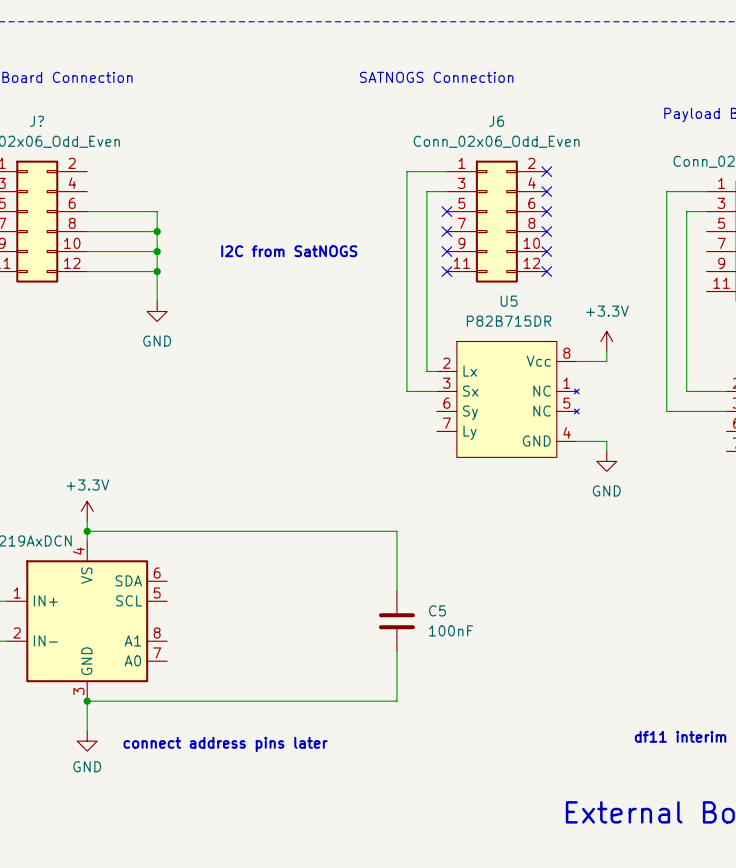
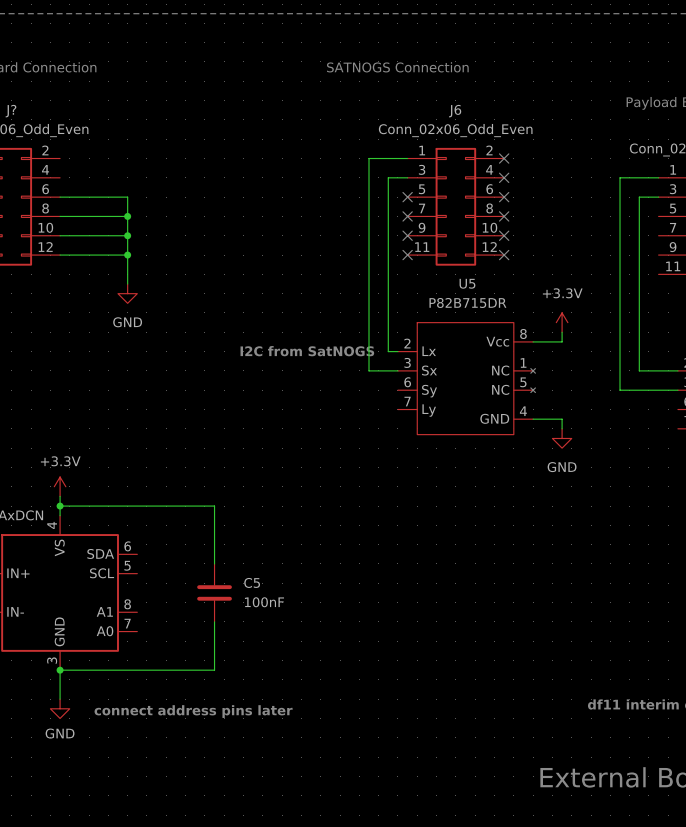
text position: I2C from SatNOGS (289, 251) -> I2C from SatNOGS (307, 351)
wire: (247, 531) (396, 531) (396, 591) -> (214, 506) (214, 563)
C5 position: (396, 621) -> (214, 592)
wire: (396, 651) (396, 701) (247, 701) -> (214, 621) (214, 670)

